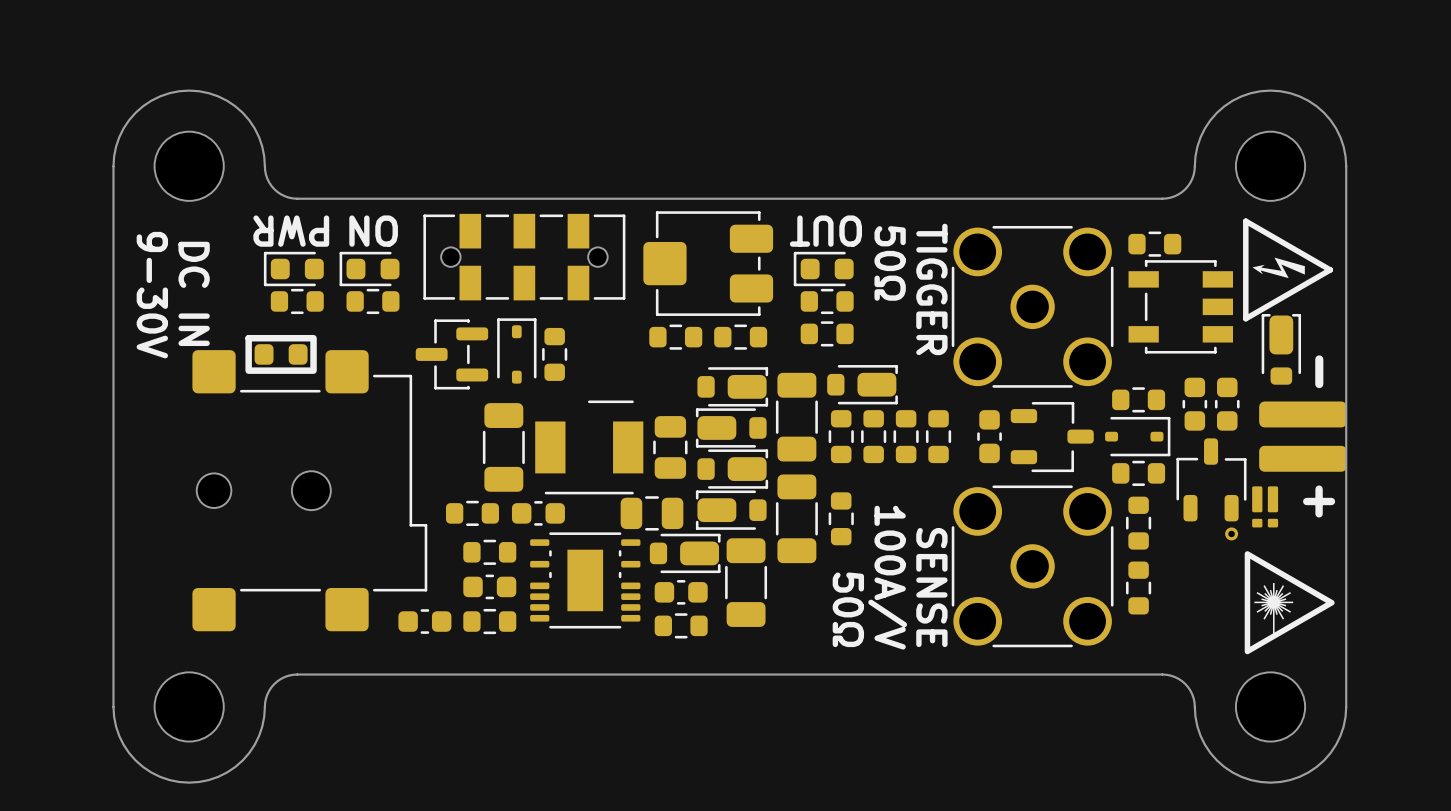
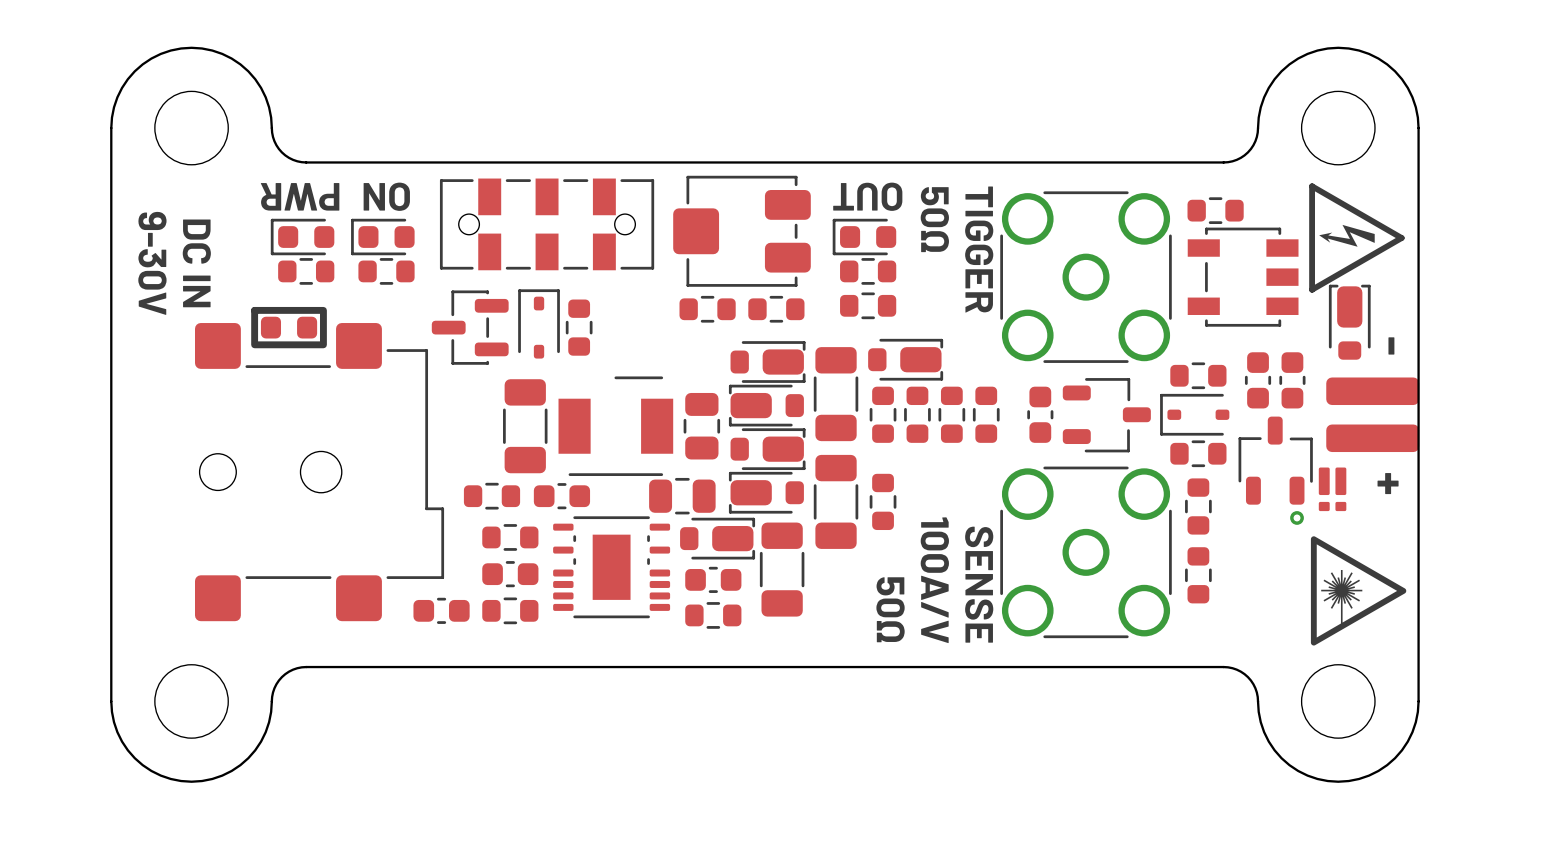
part rotation: 0° (1137, 436) -> 180° (1194, 414)

